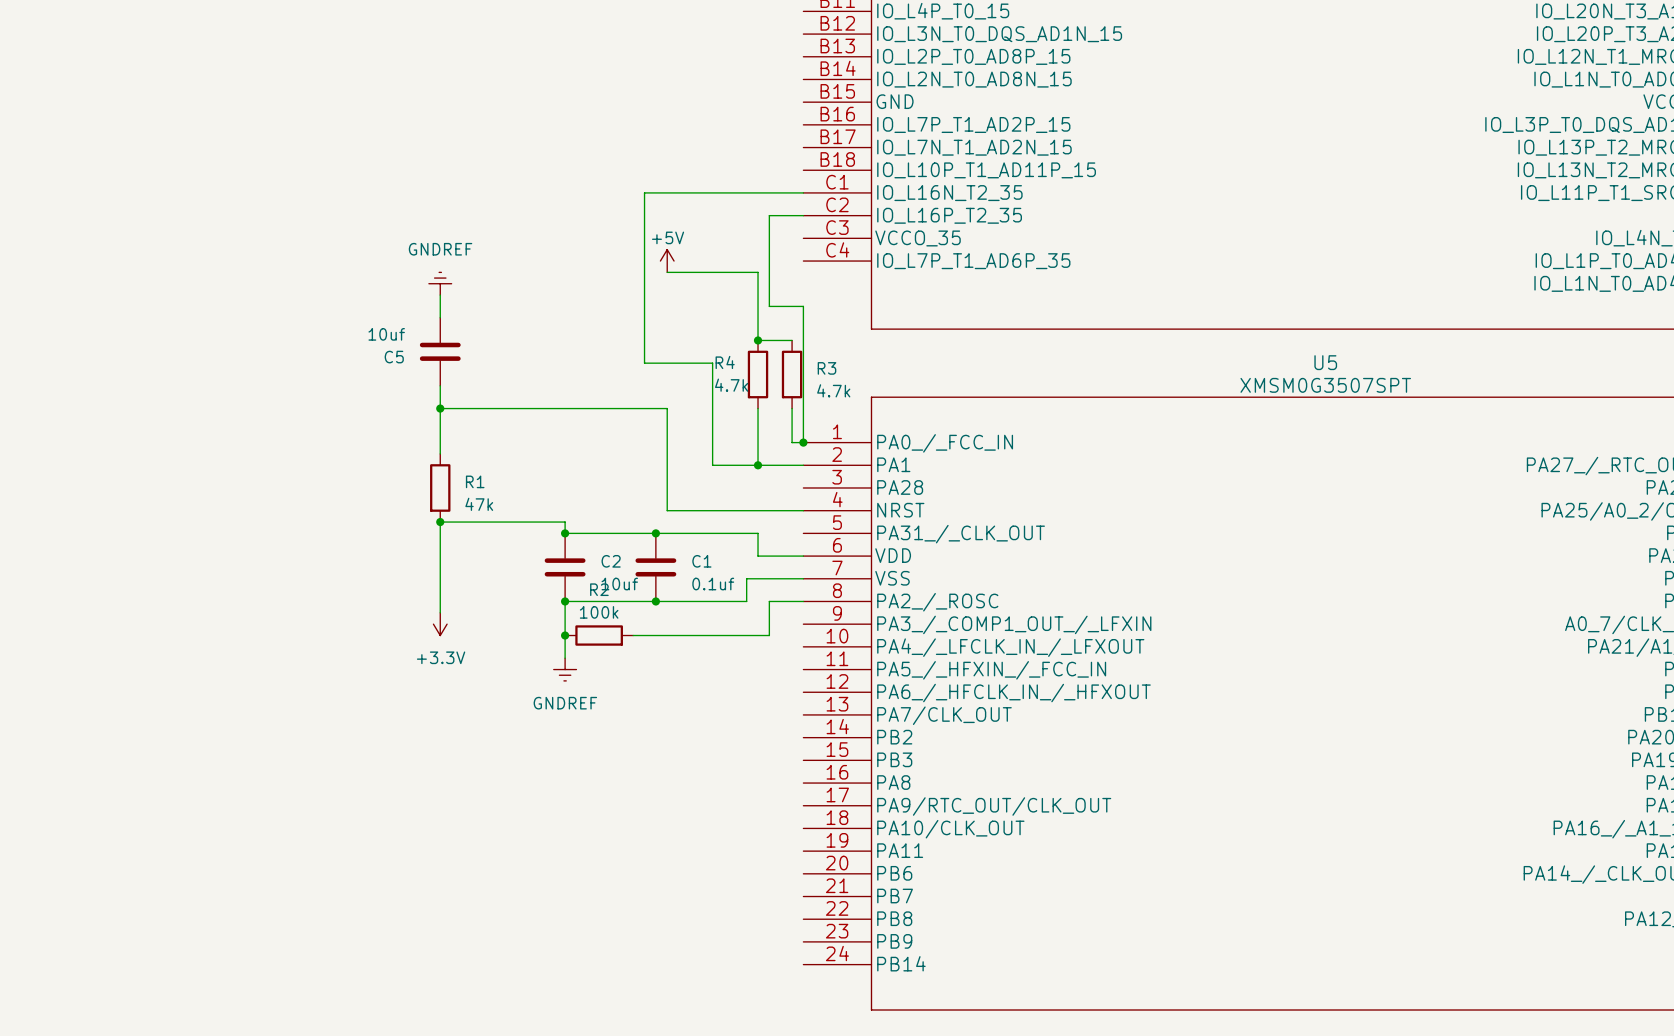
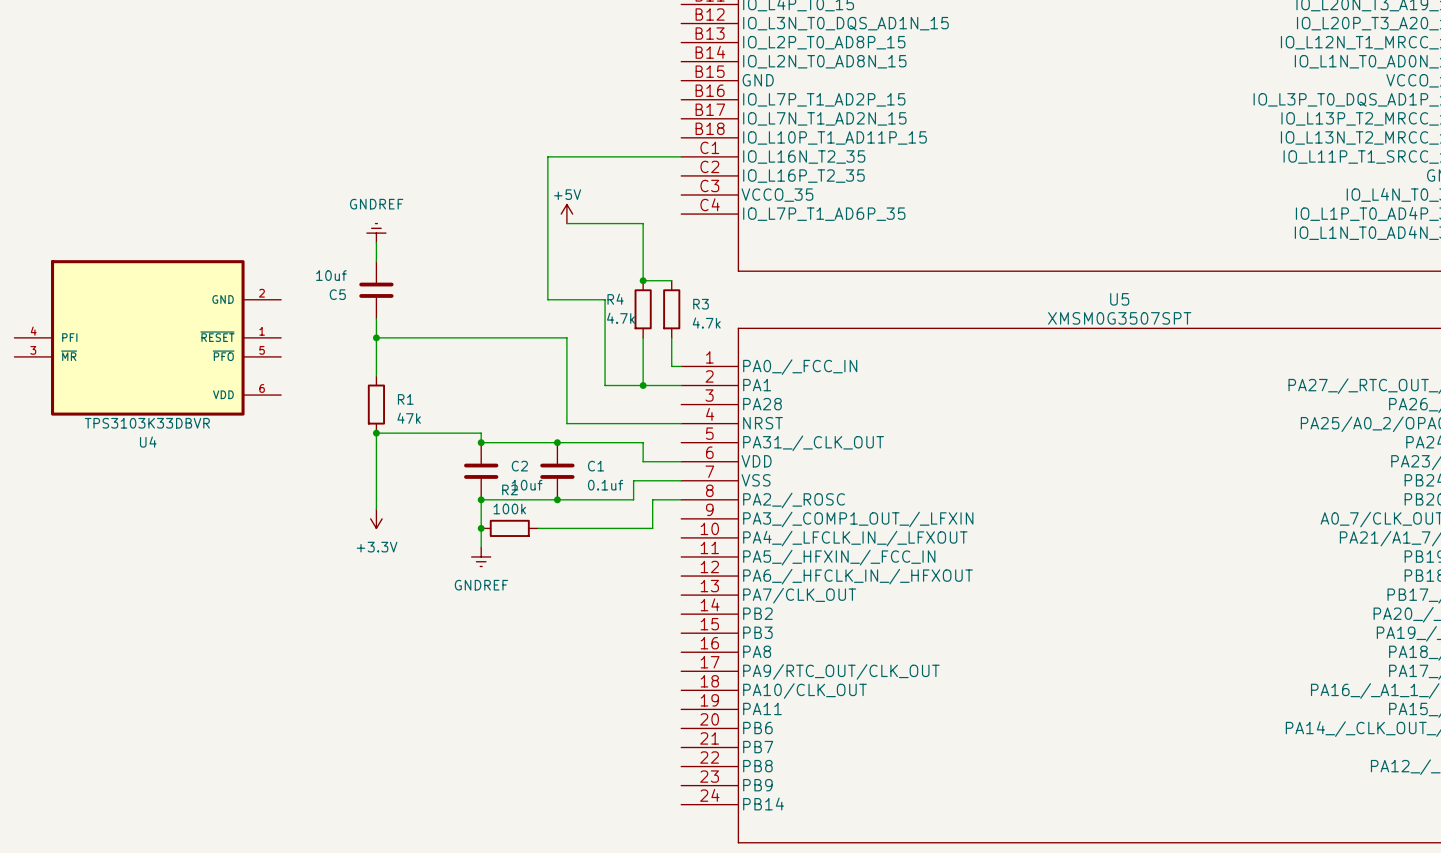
wire: (803, 215) (769, 215) (769, 306) (803, 306) (803, 442) -> none
U4: none -> TPS3103K33DBVR (147, 337)
junction: (803, 442) -> none

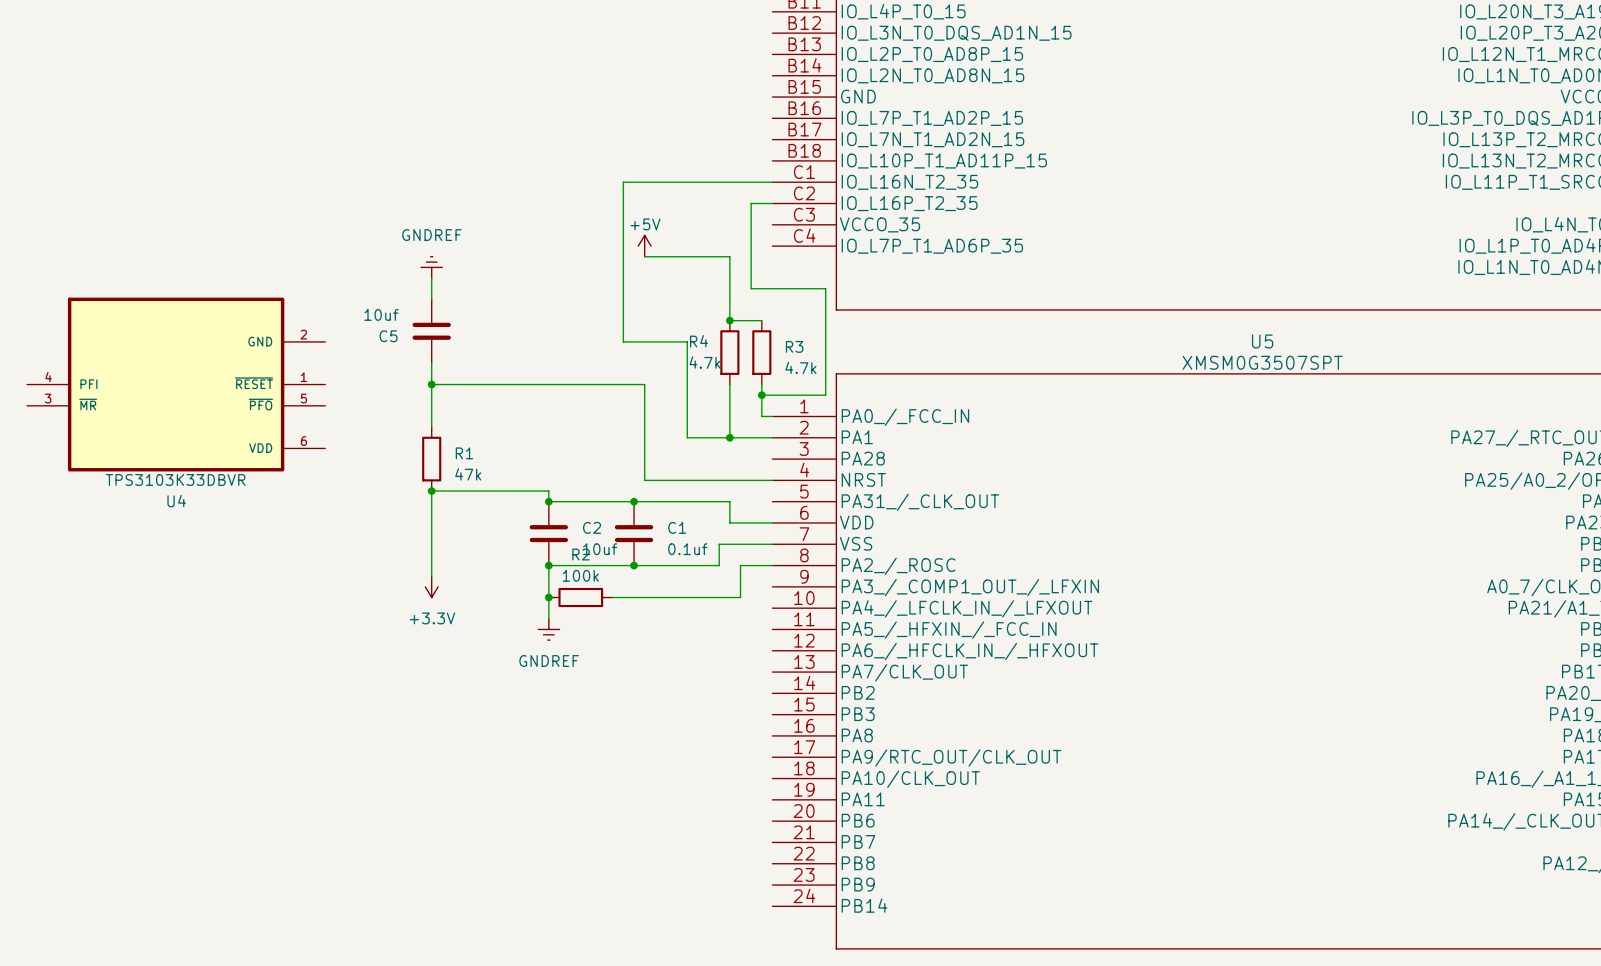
wire: none -> (772, 203) (751, 203) (751, 288) (825, 288) (825, 395) (761, 395)
junction: none -> (761, 395)

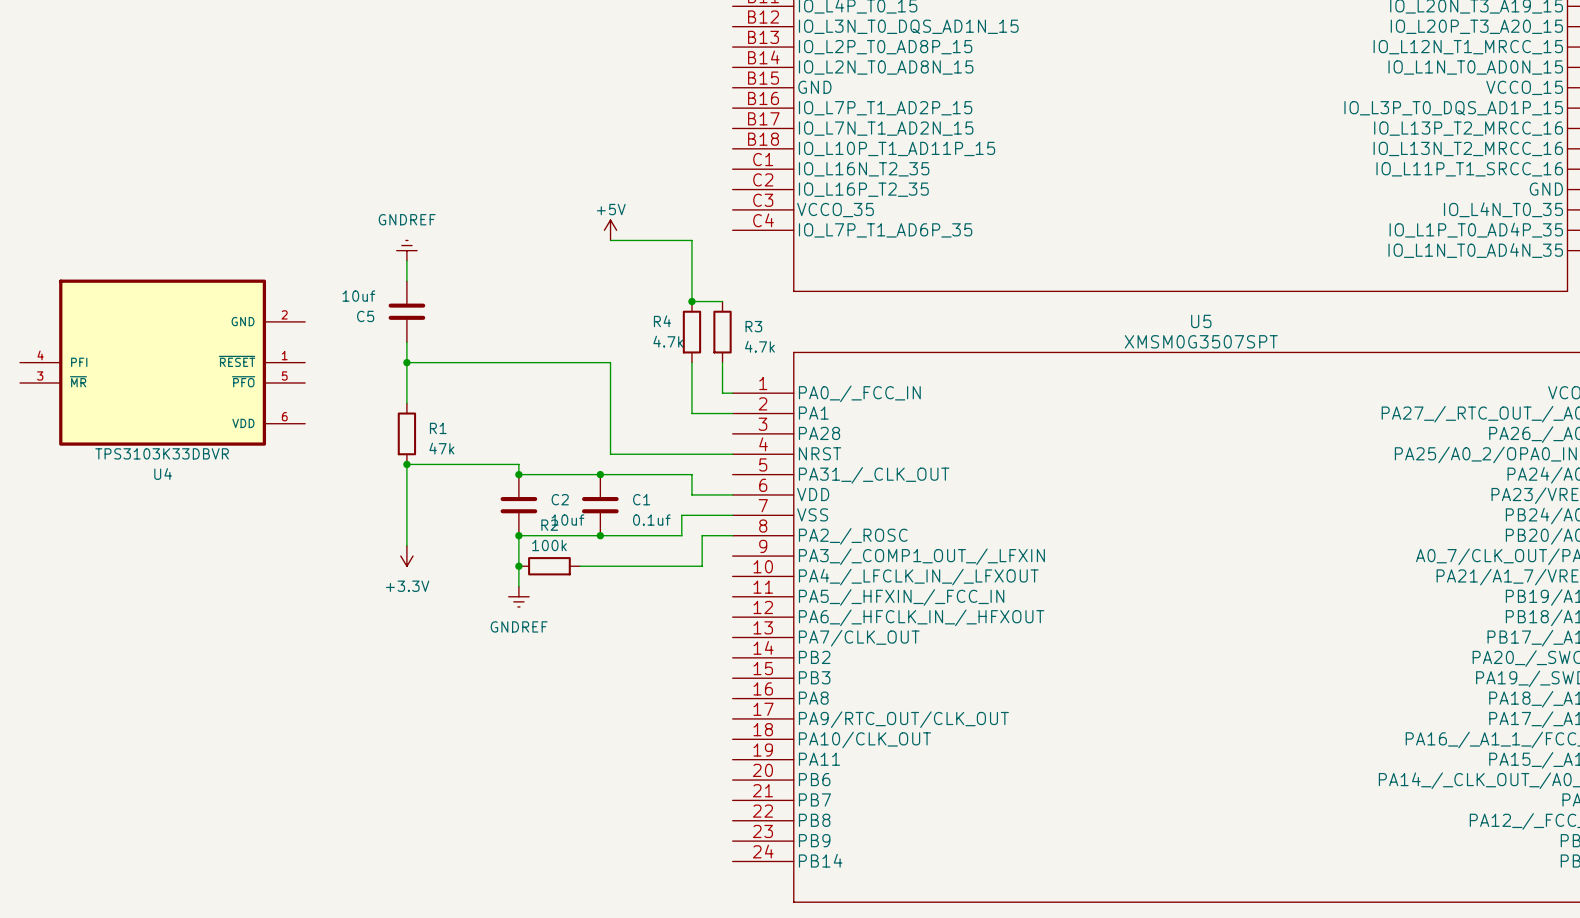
wire: (772, 182) (623, 182) (623, 341) (687, 341) (687, 437) (729, 437) -> none
wire: (772, 203) (751, 203) (751, 288) (825, 288) (825, 395) (761, 395) -> none
junction: (761, 395) -> none
junction: (729, 437) -> none

